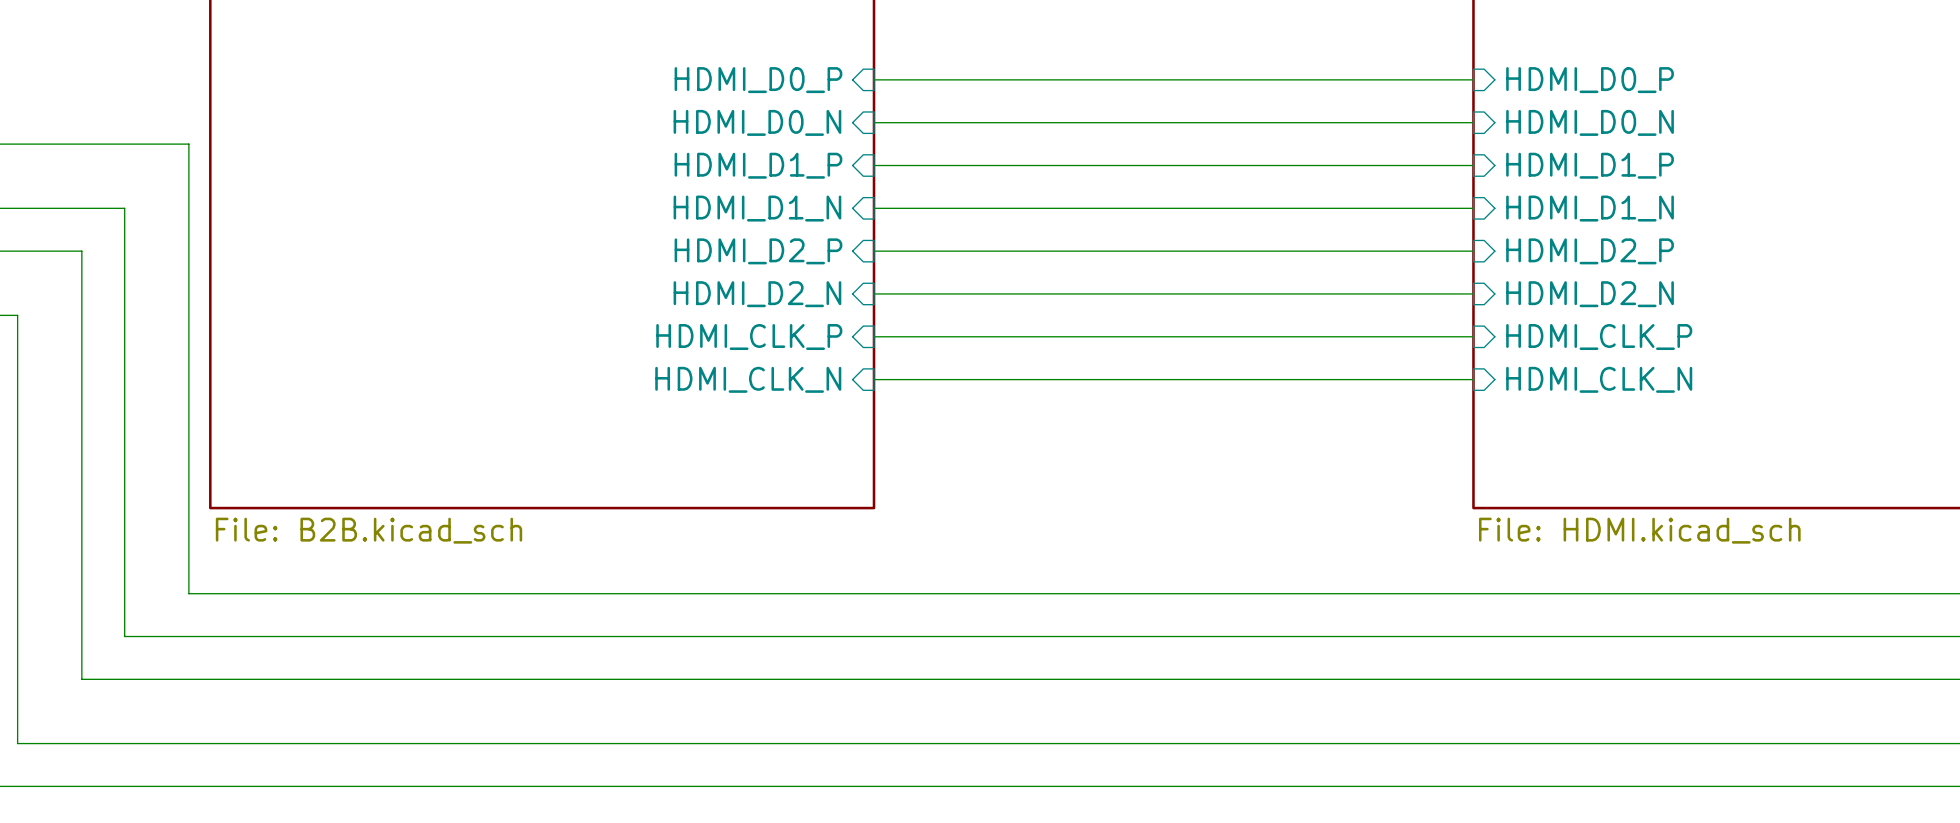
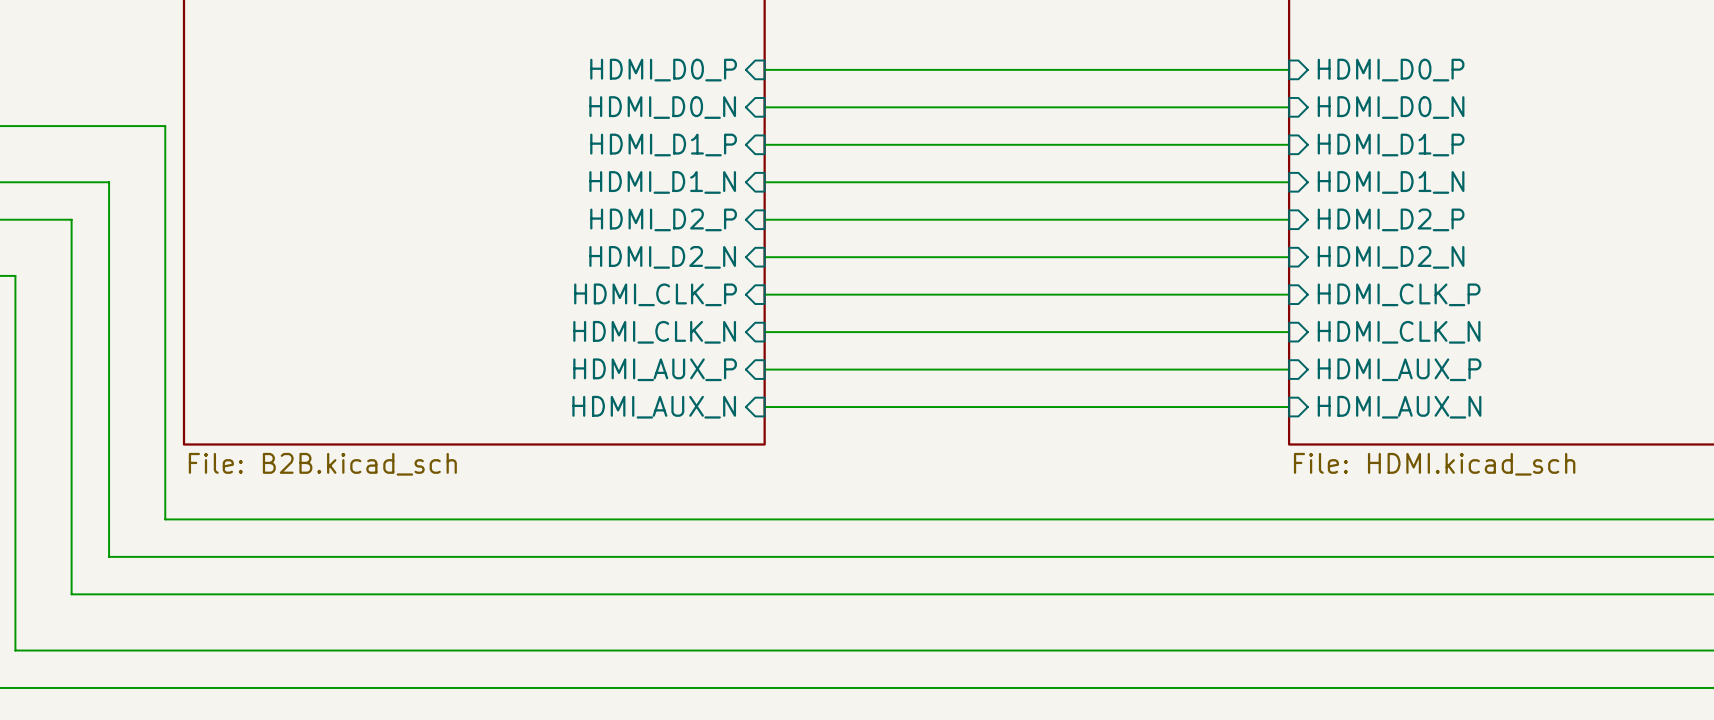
sheet pin: none -> HDMI_AUX_P (655, 369)
wire: none -> (764, 369) (1289, 369)
sheet pin: none -> HDMI_AUX_P (1399, 369)
sheet pin: none -> HDMI_AUX_N (654, 407)
wire: none -> (764, 407) (1289, 407)
sheet pin: none -> HDMI_AUX_N (1399, 407)

